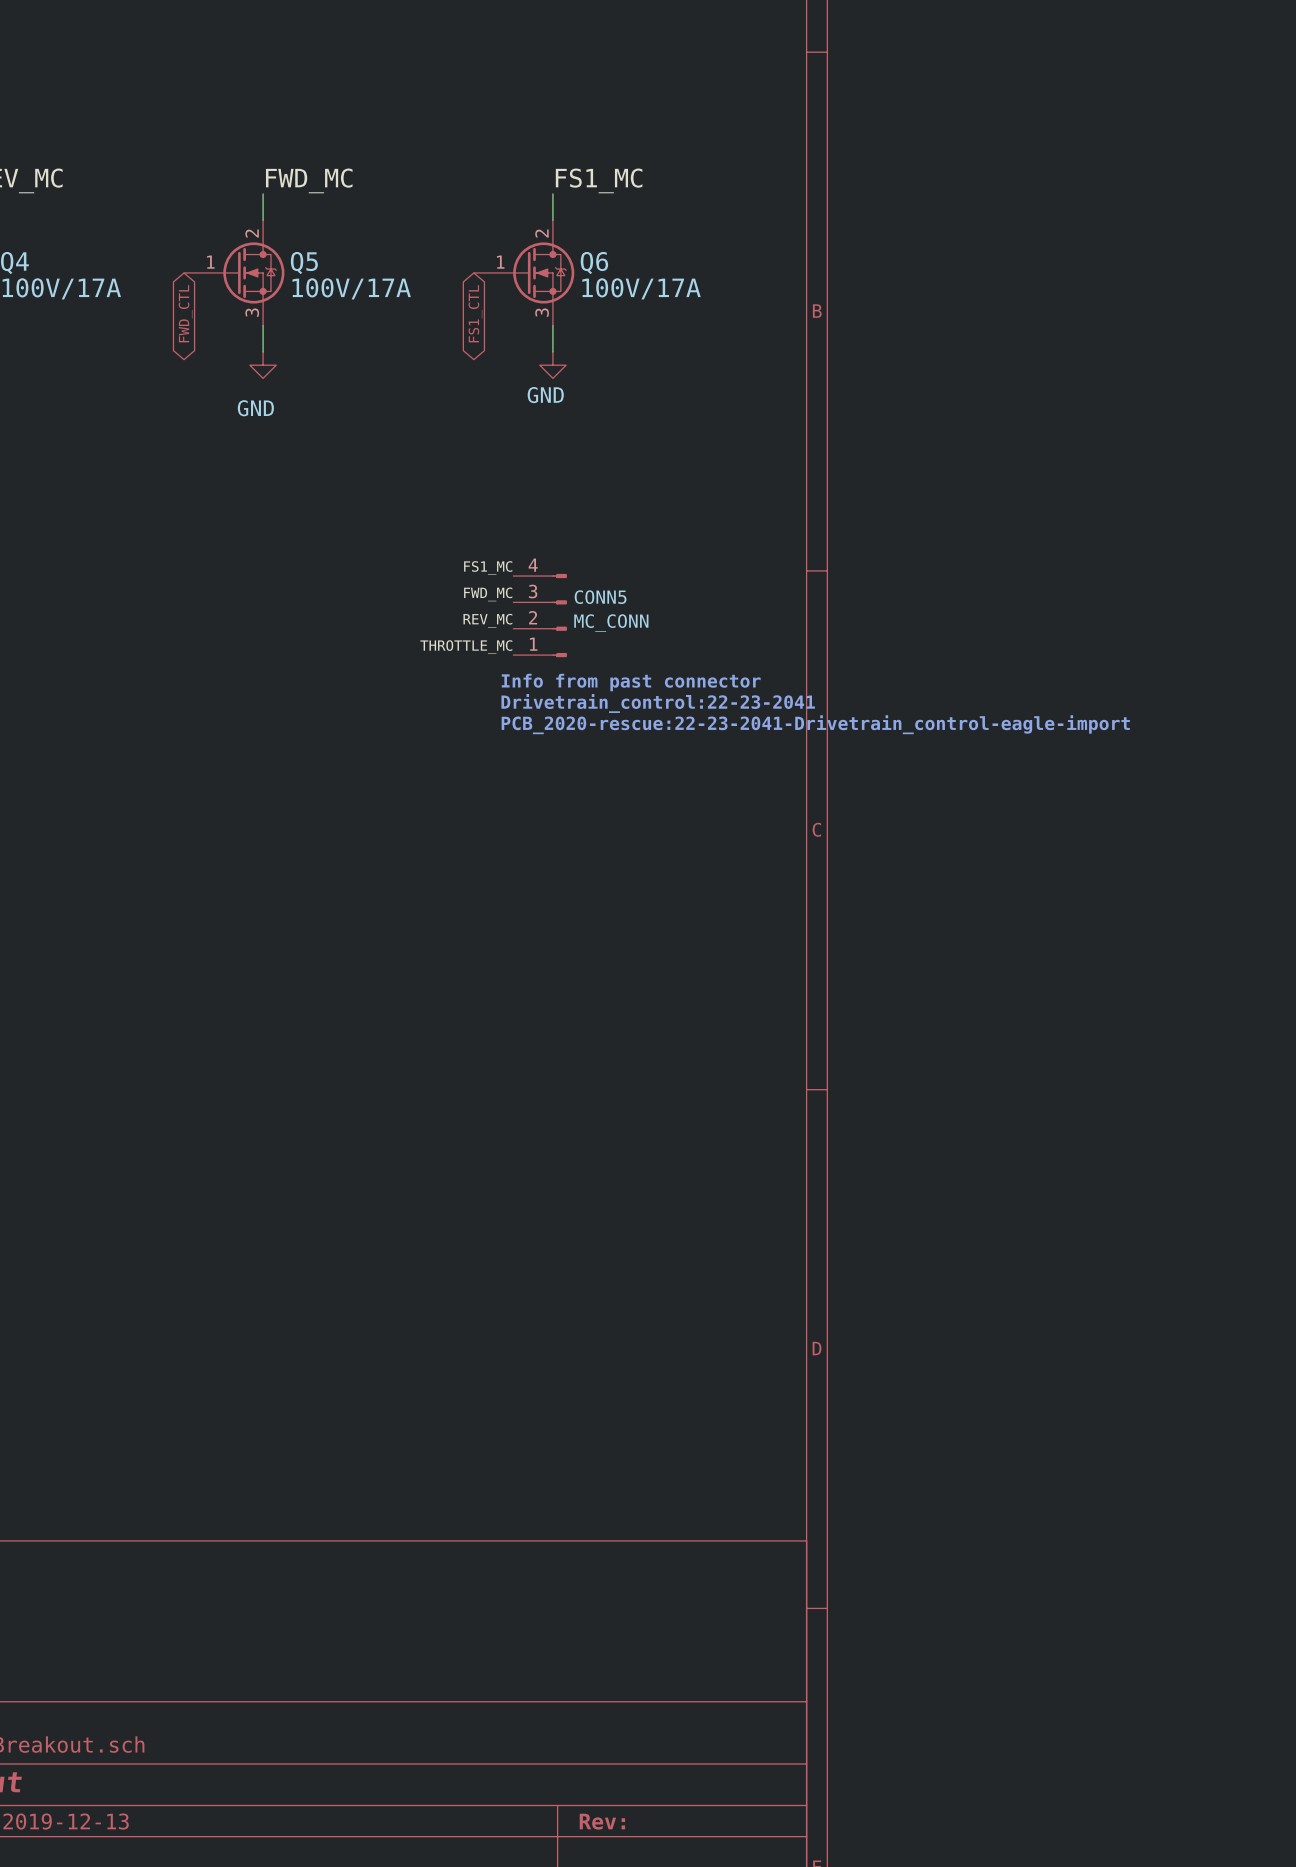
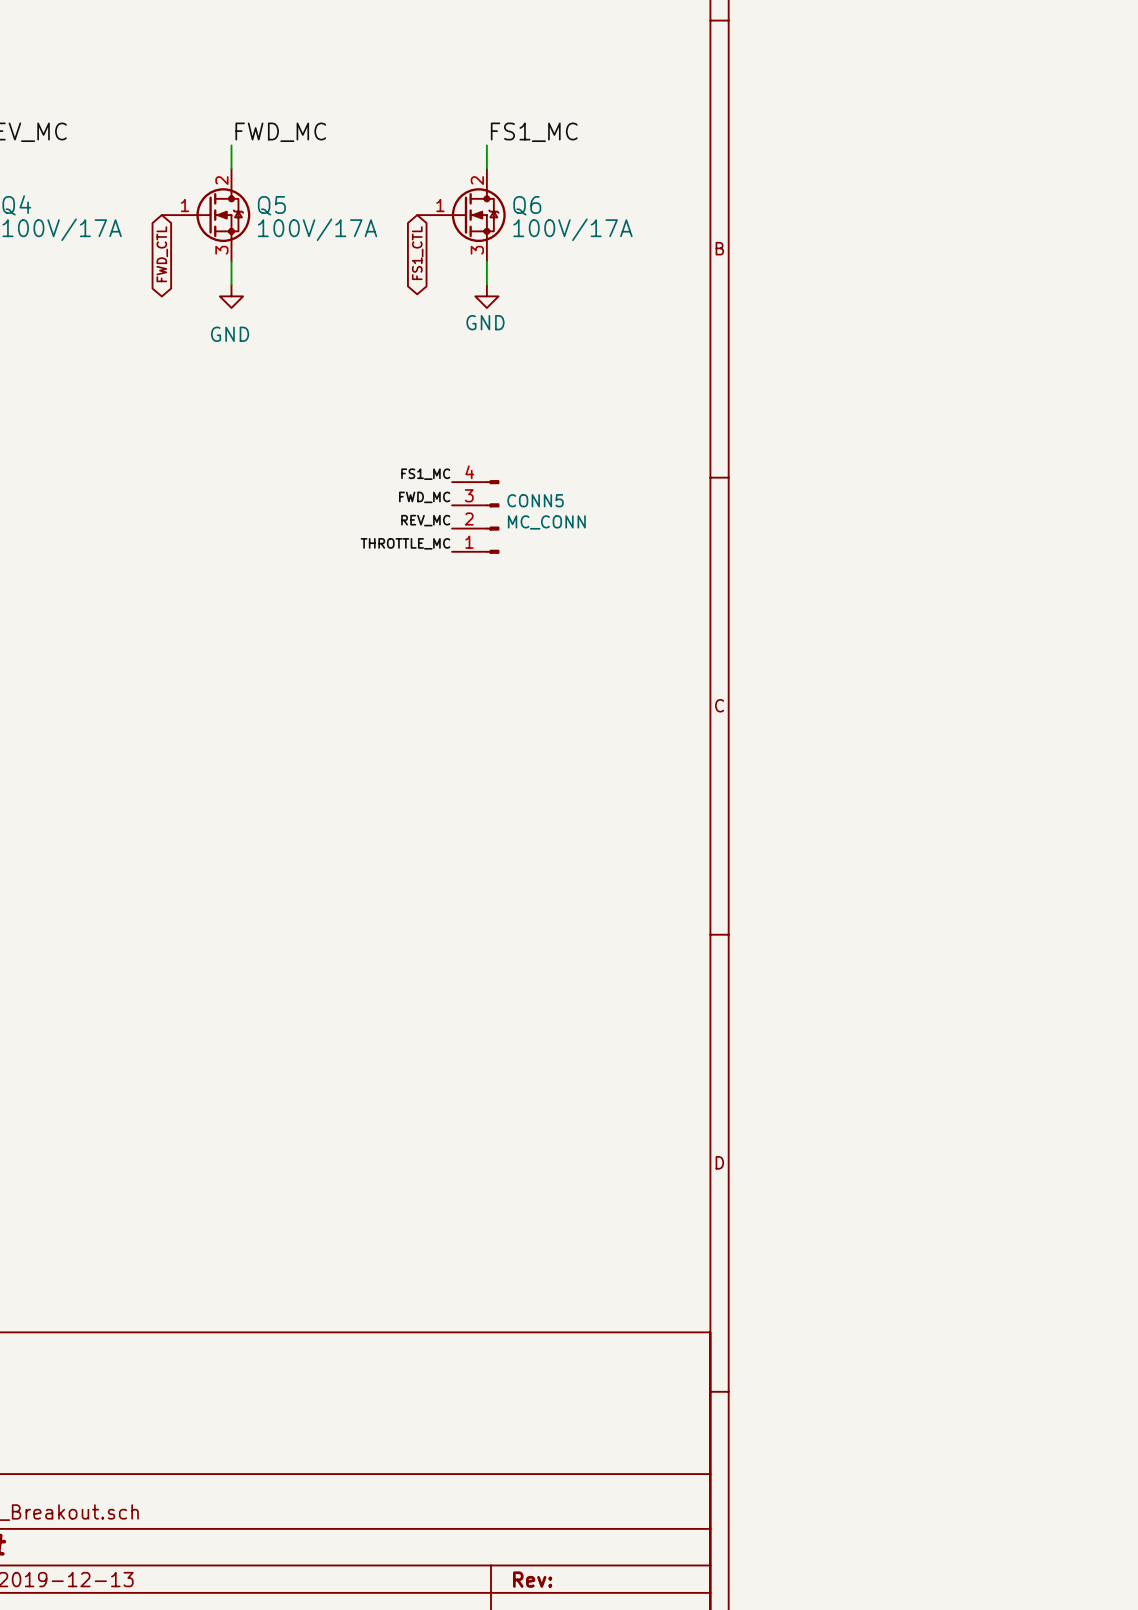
text: Info from past connector (631, 682) -> none
text: Drivetrain_control:22-23-2041 (658, 703) -> none
text: PCB_2020-rescue:22-23-2041-Drivetrain_control-eagle-import (815, 724) -> none

